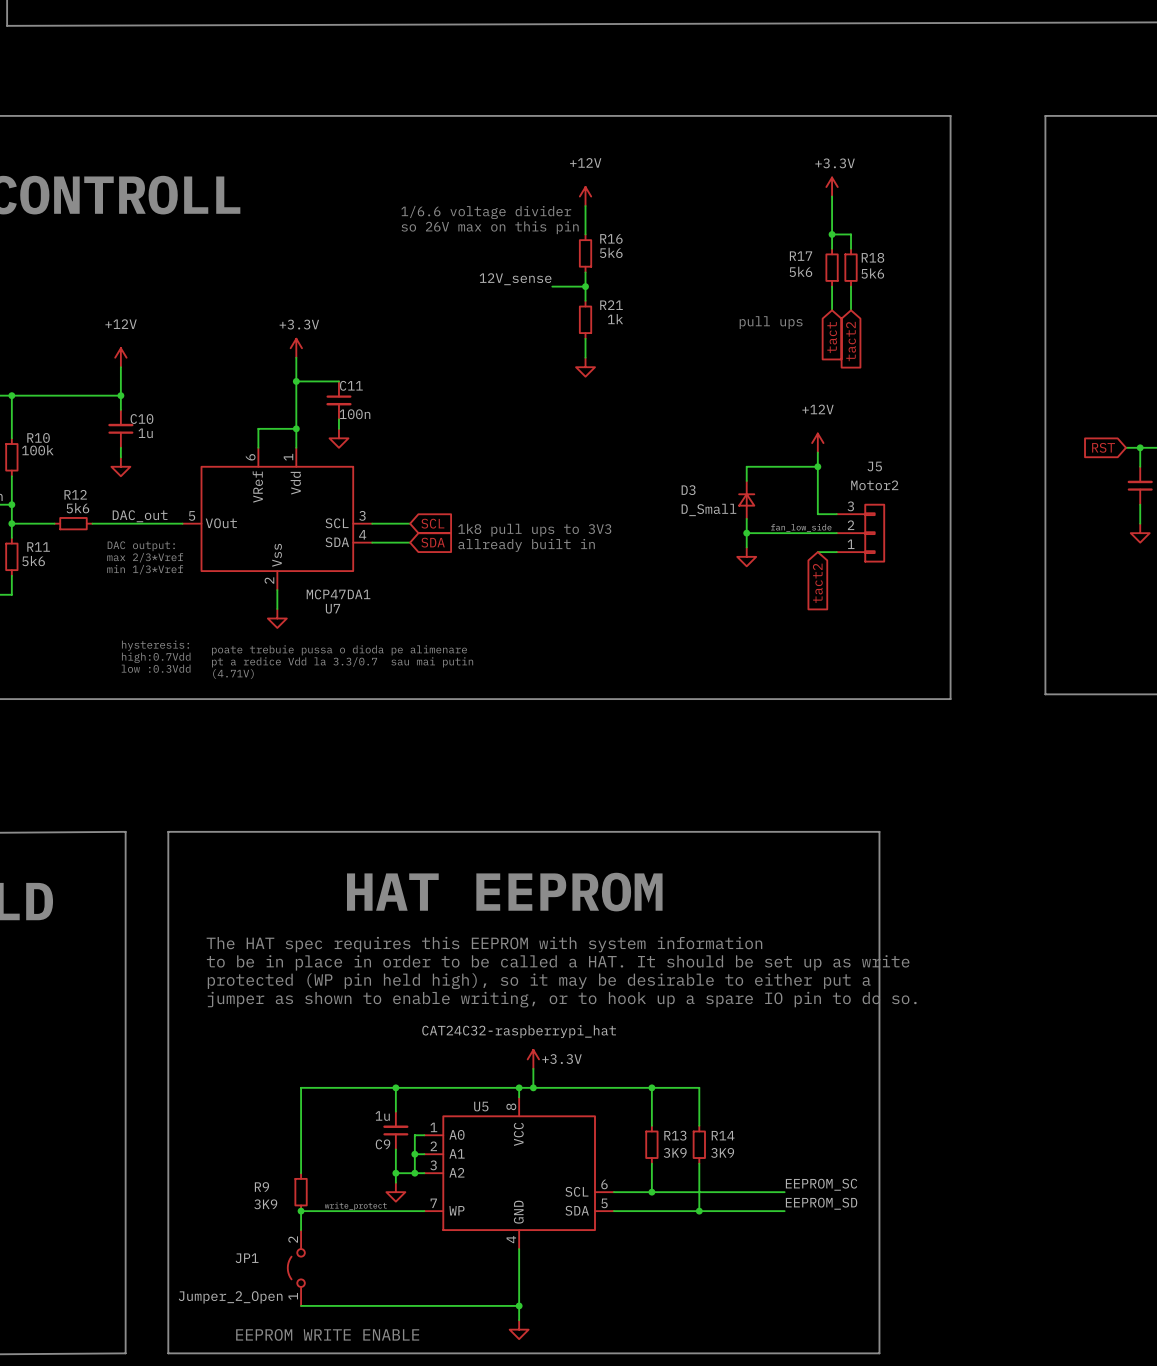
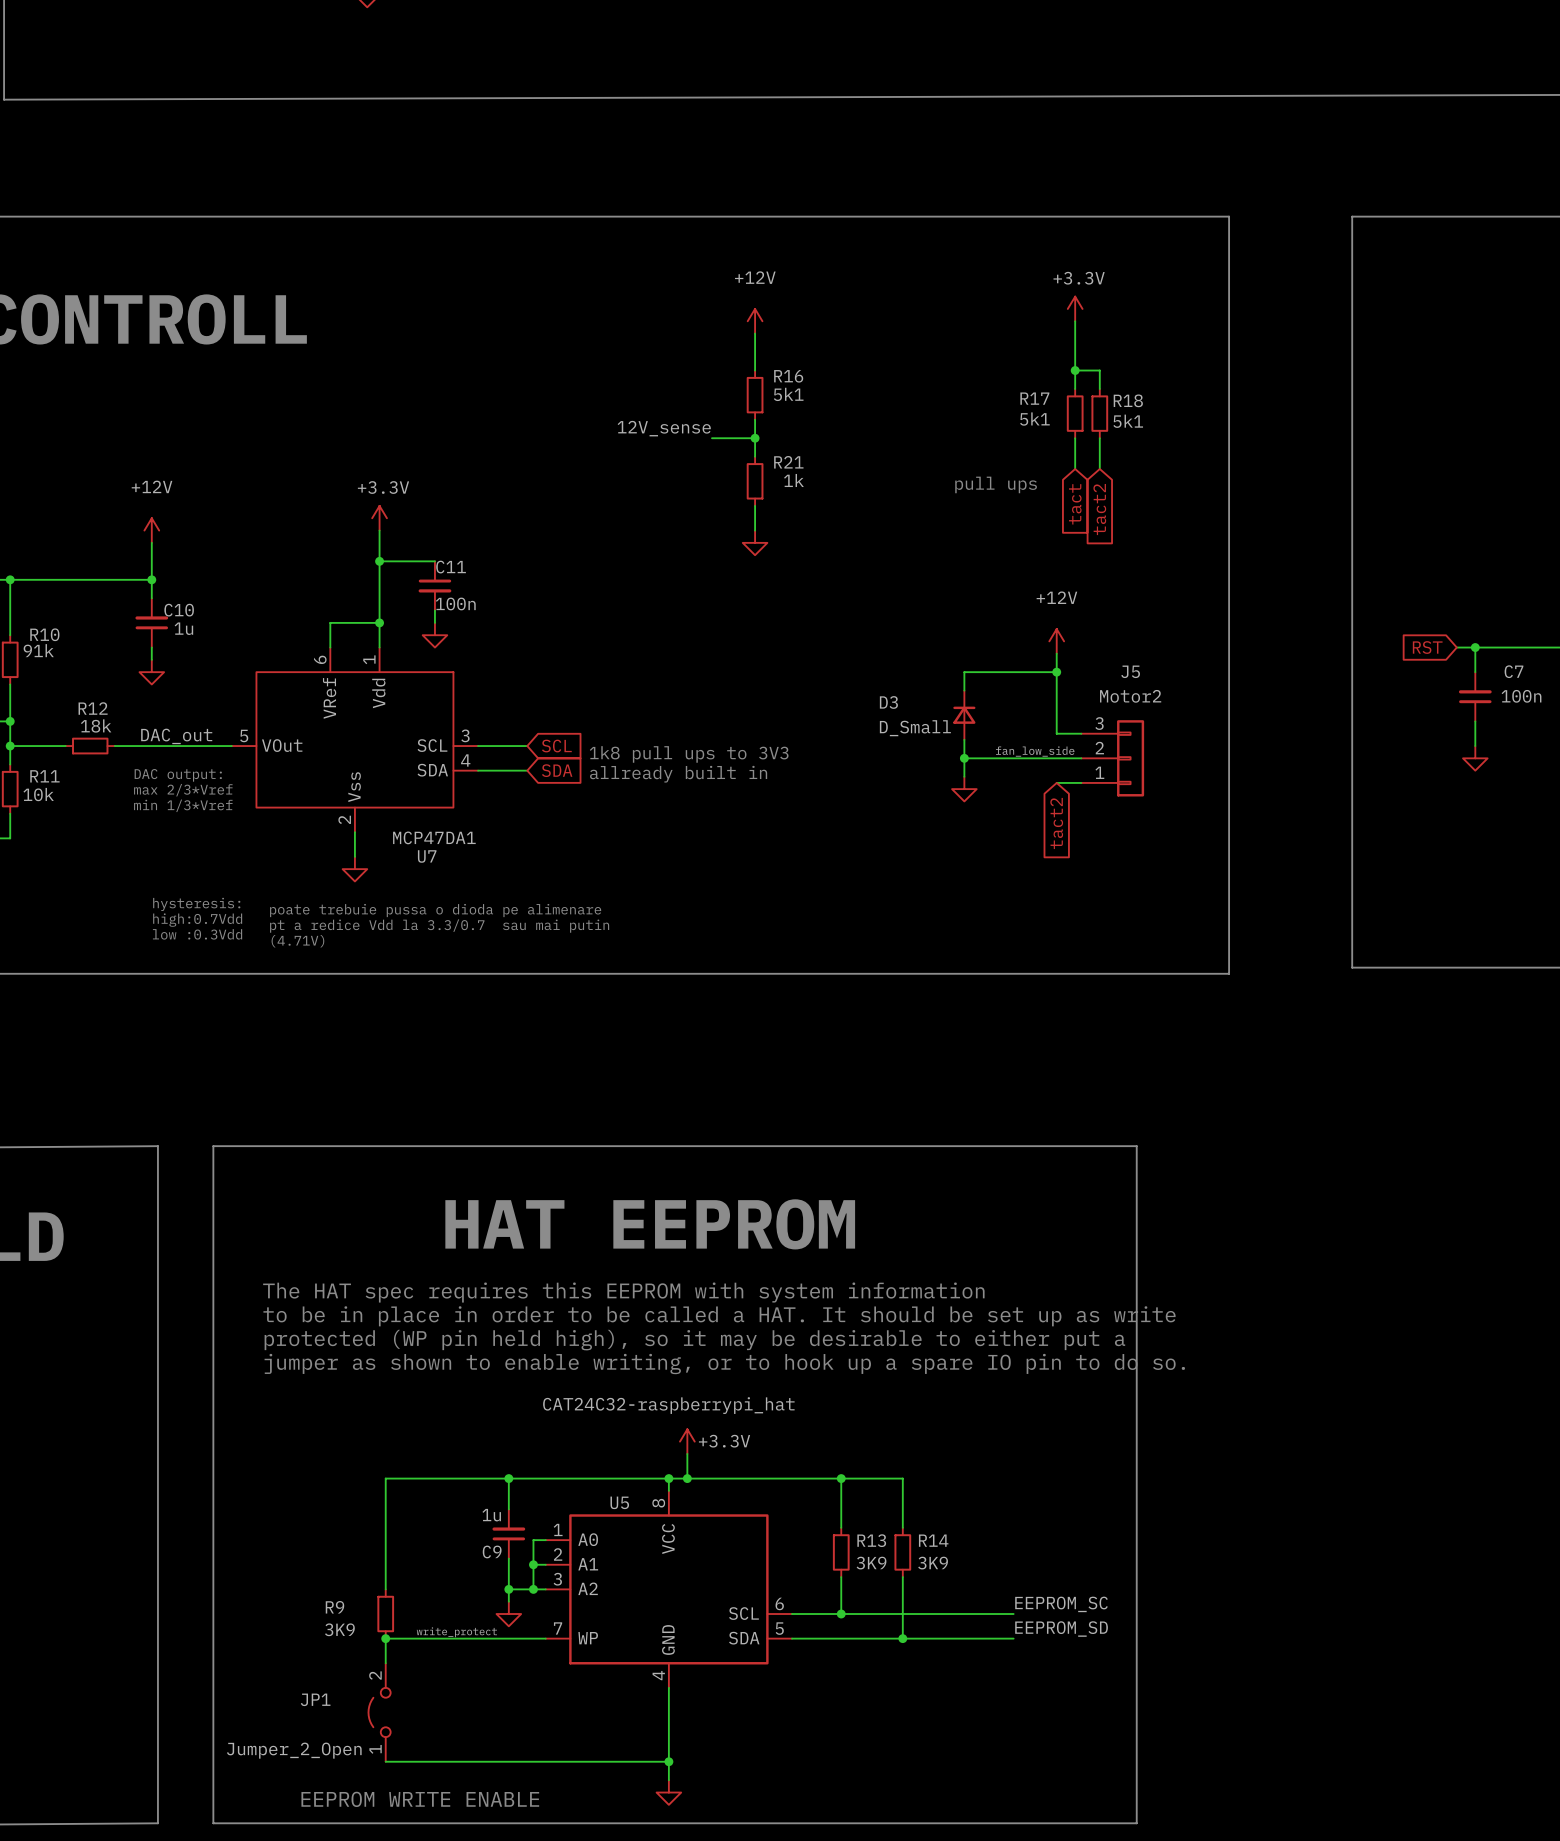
text: 1/6.6 voltage divider (486, 212) -> none
text: so 26V max on this pin (490, 227) -> none
R16 value: 5k6 (611, 252) -> 5k1 (788, 394)
R17 value: 5k6 (800, 271) -> 5k1 (1034, 419)
R18 value: 5k6 (872, 273) -> 5k1 (1128, 421)
R10 value: 100k (37, 450) -> 91k (38, 650)
R12 value: 5k6 (77, 508) -> 18k (96, 725)
R11 value: 5k6 (33, 561) -> 10k (38, 794)

